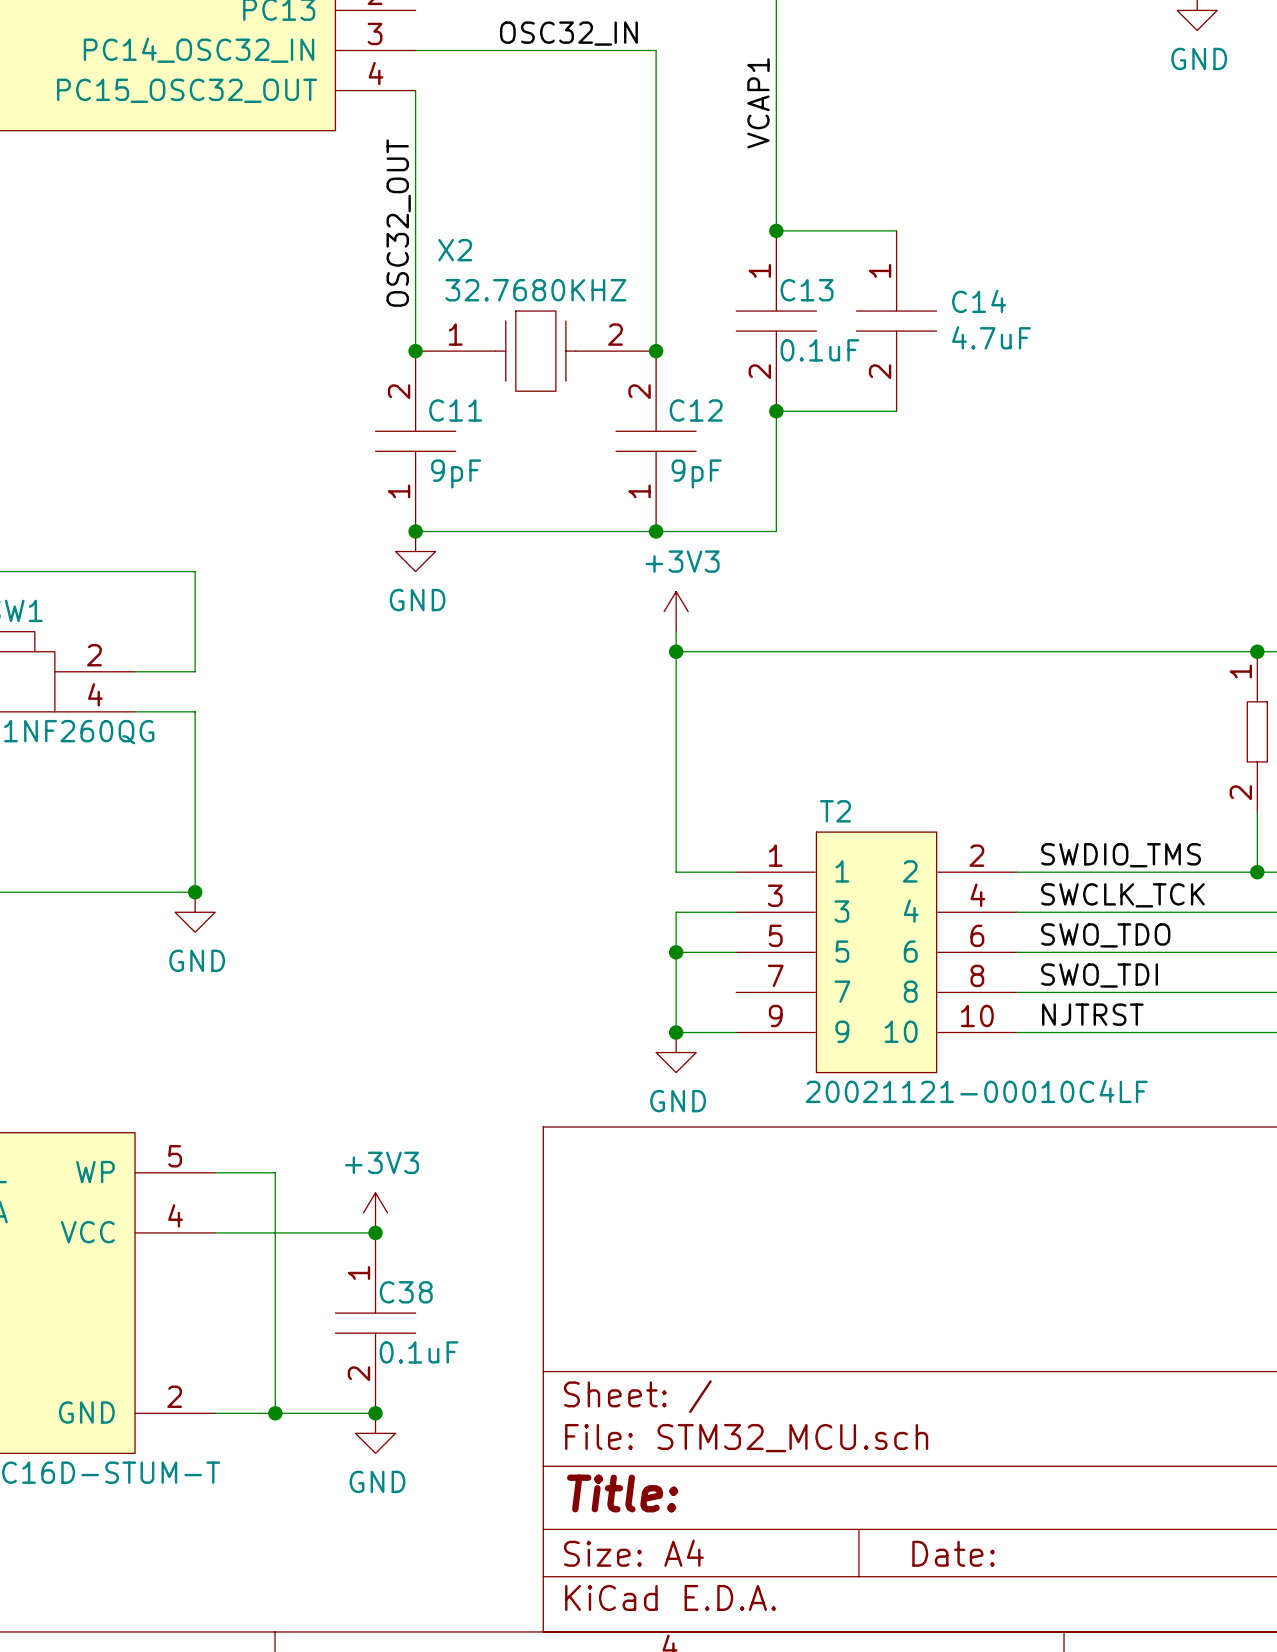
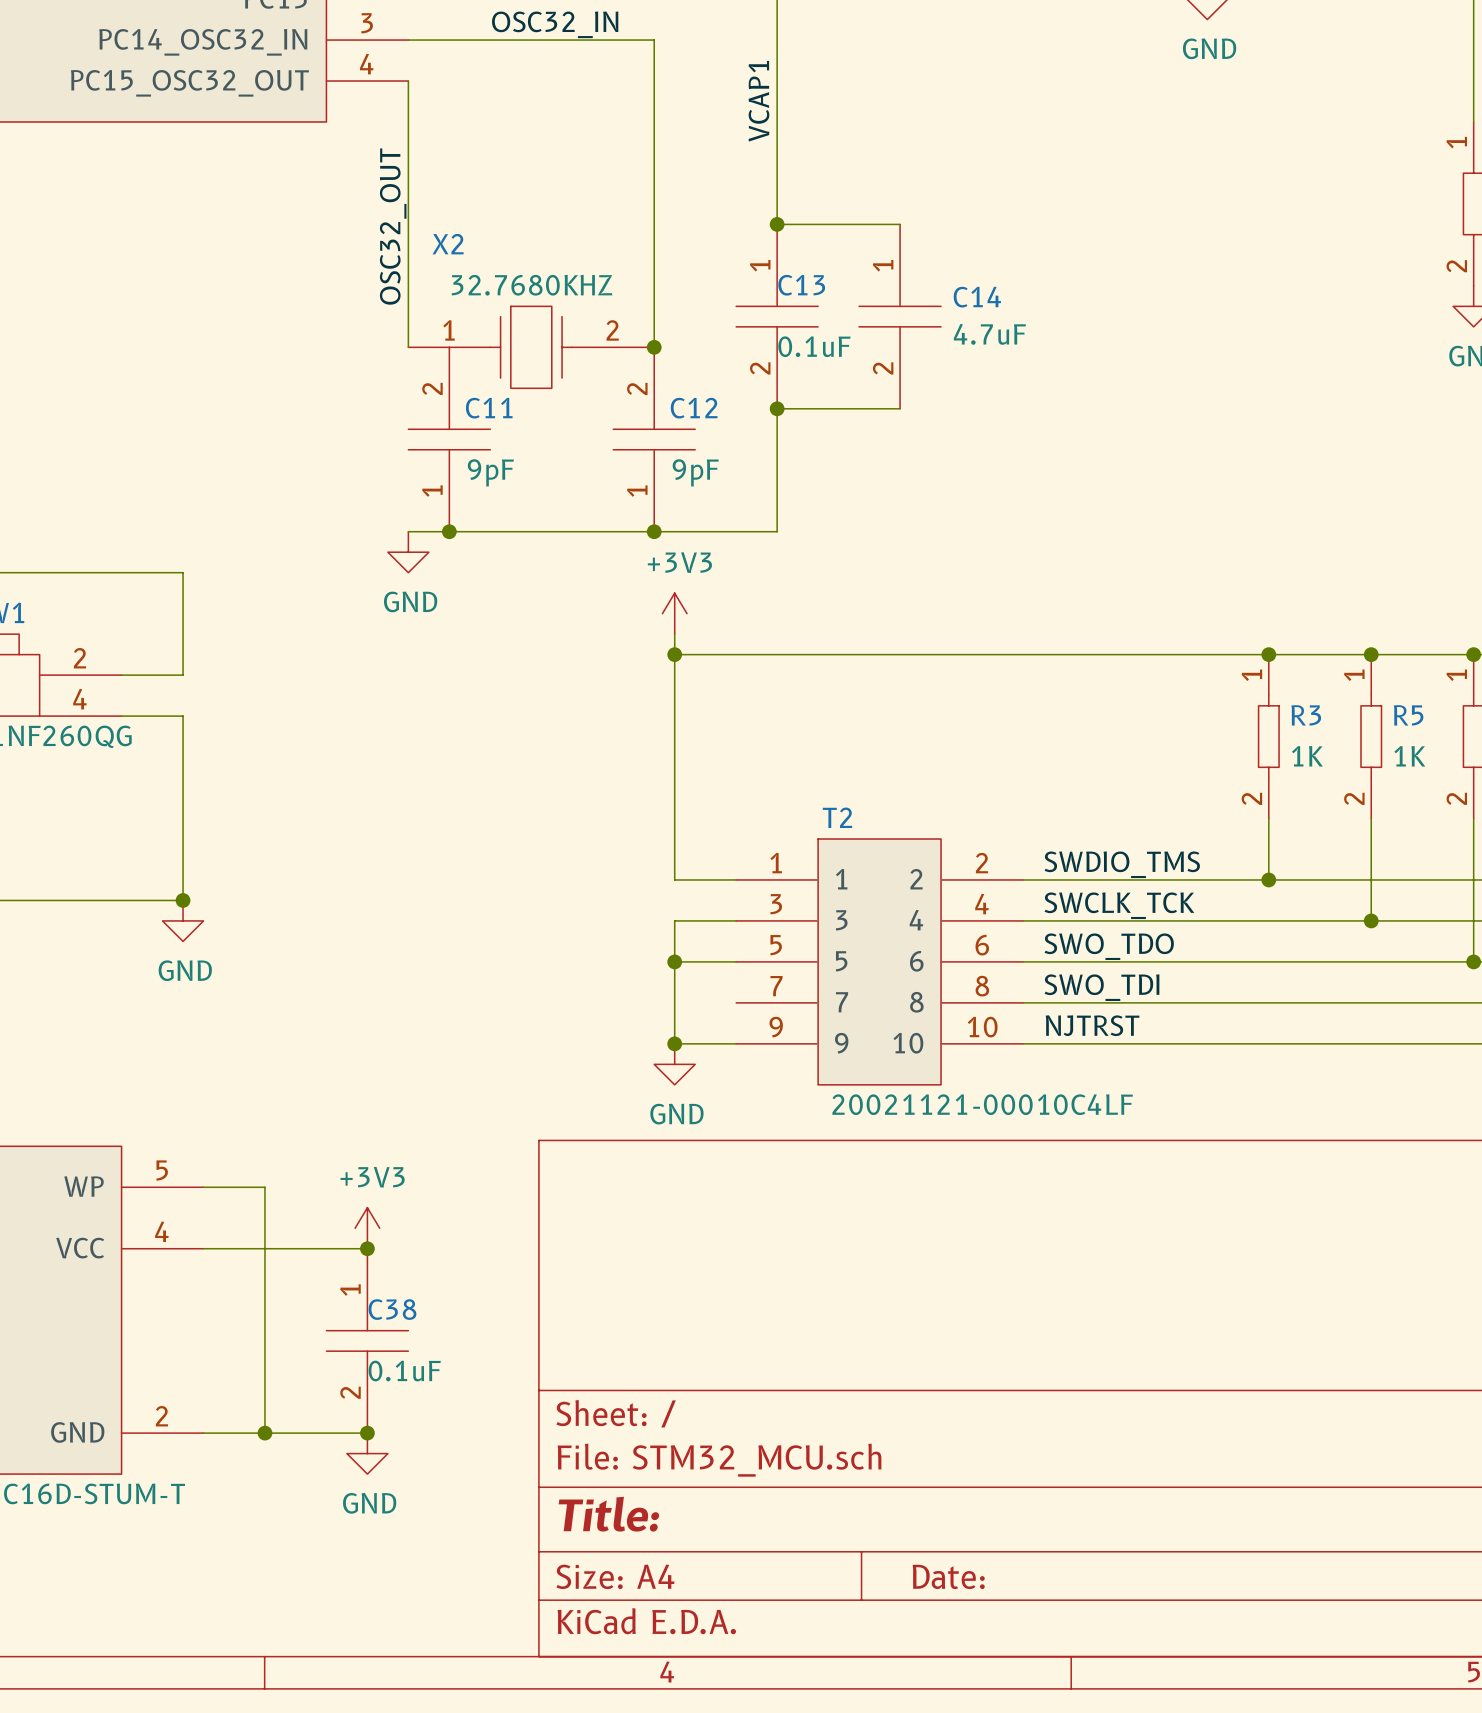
junction: (415, 351) -> none
C11 position: (415, 441) -> (449, 439)
junction position: (415, 531) -> (449, 531)

